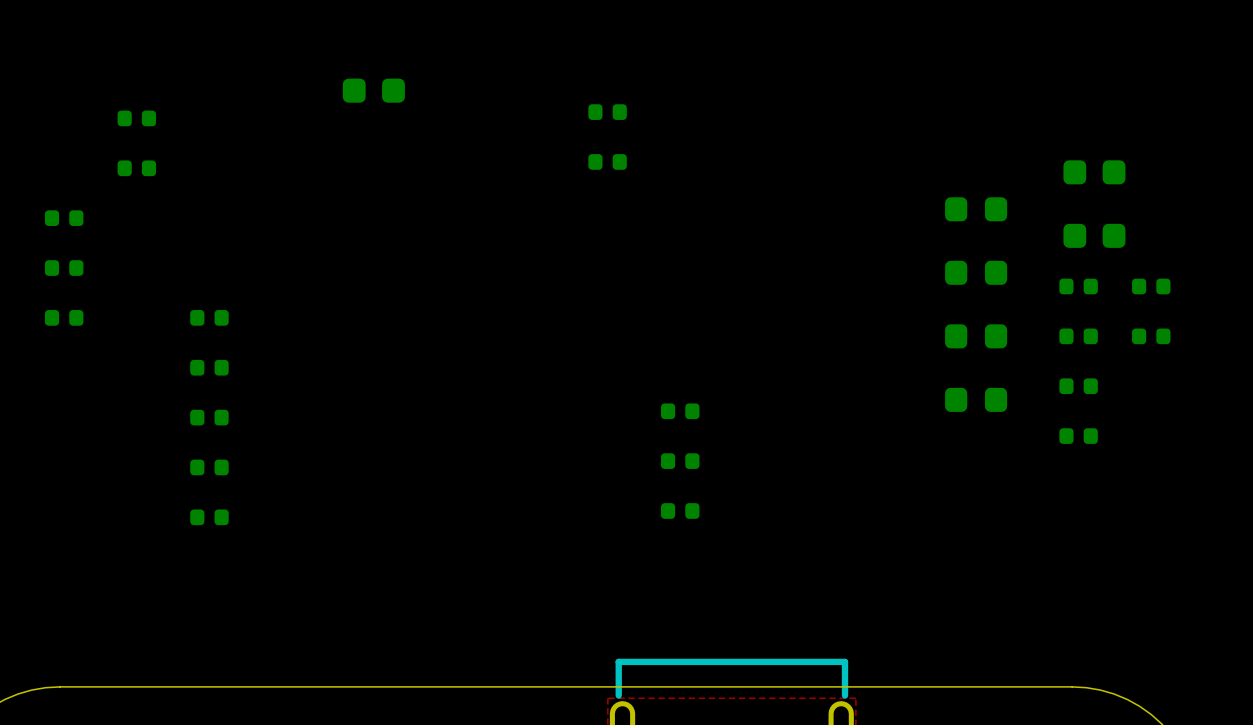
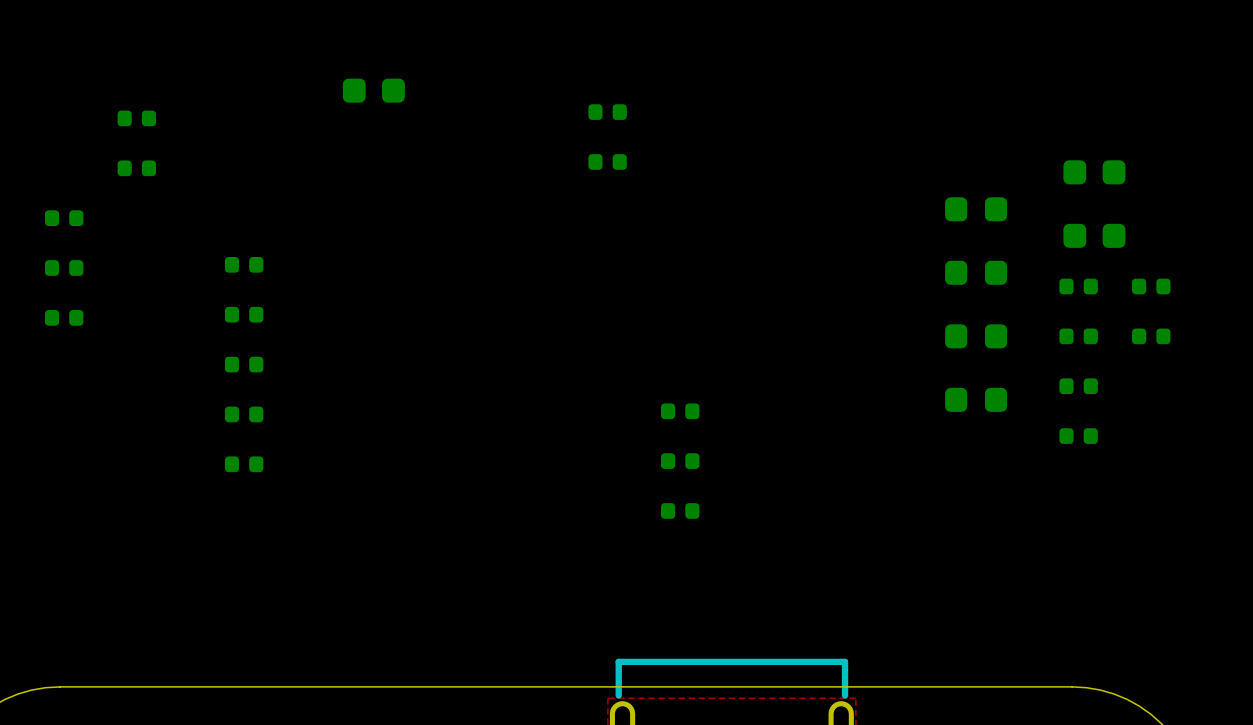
part: none -> (244, 264)
part: none -> (244, 314)
part: (209, 317) -> none
part: none -> (244, 364)
part: (209, 367) -> none
part: none -> (244, 414)
part: (209, 417) -> none
part: none -> (244, 464)
part: (209, 467) -> none
part: (209, 517) -> none

